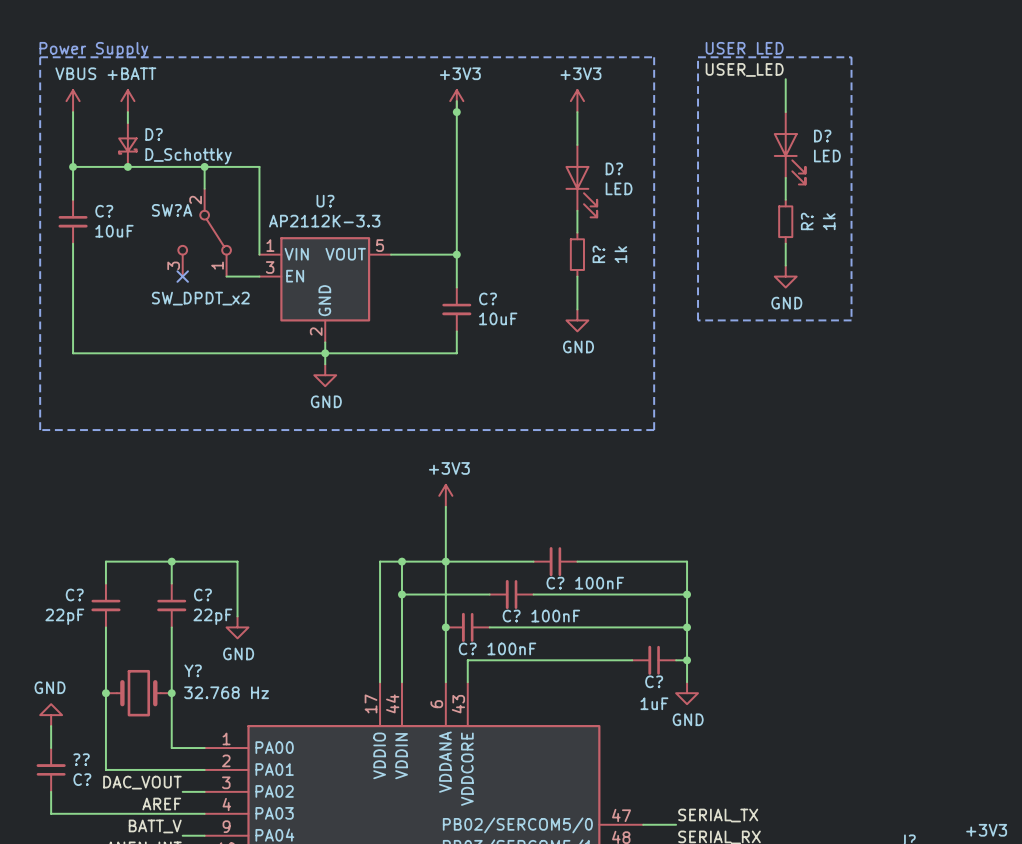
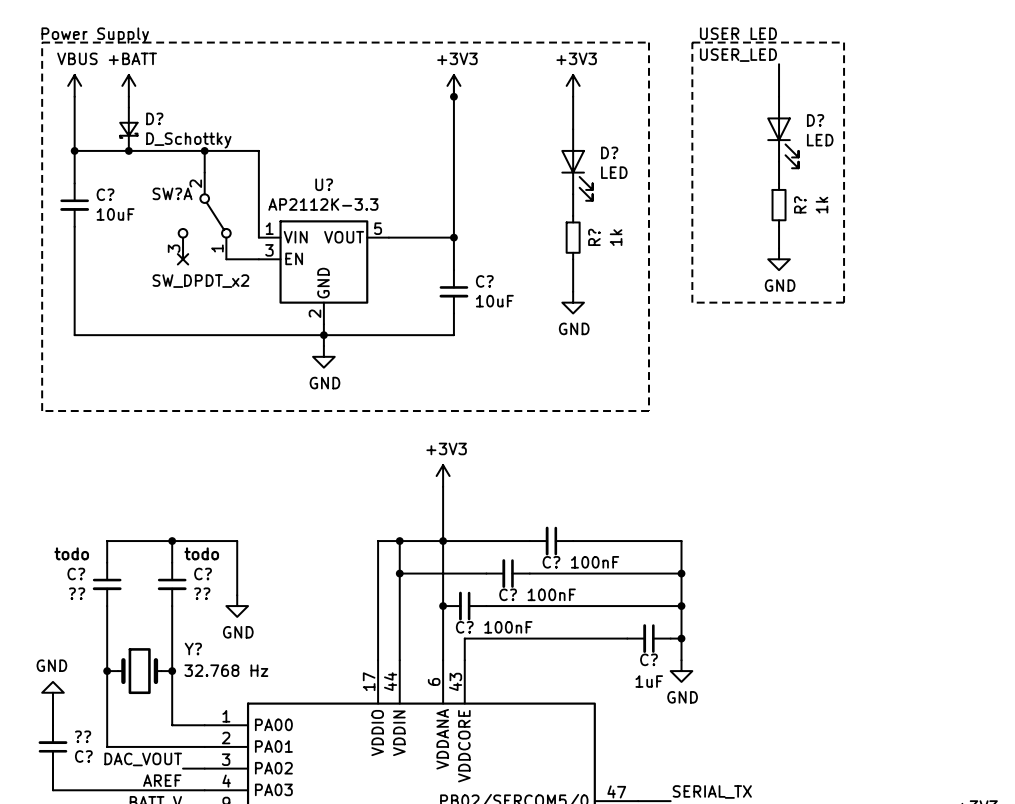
text: none -> todo (71, 553)
text: none -> todo (201, 553)
C? value: 22pF (64, 616) -> ?? (77, 593)
C? value: 22pF (212, 616) -> ?? (202, 593)

